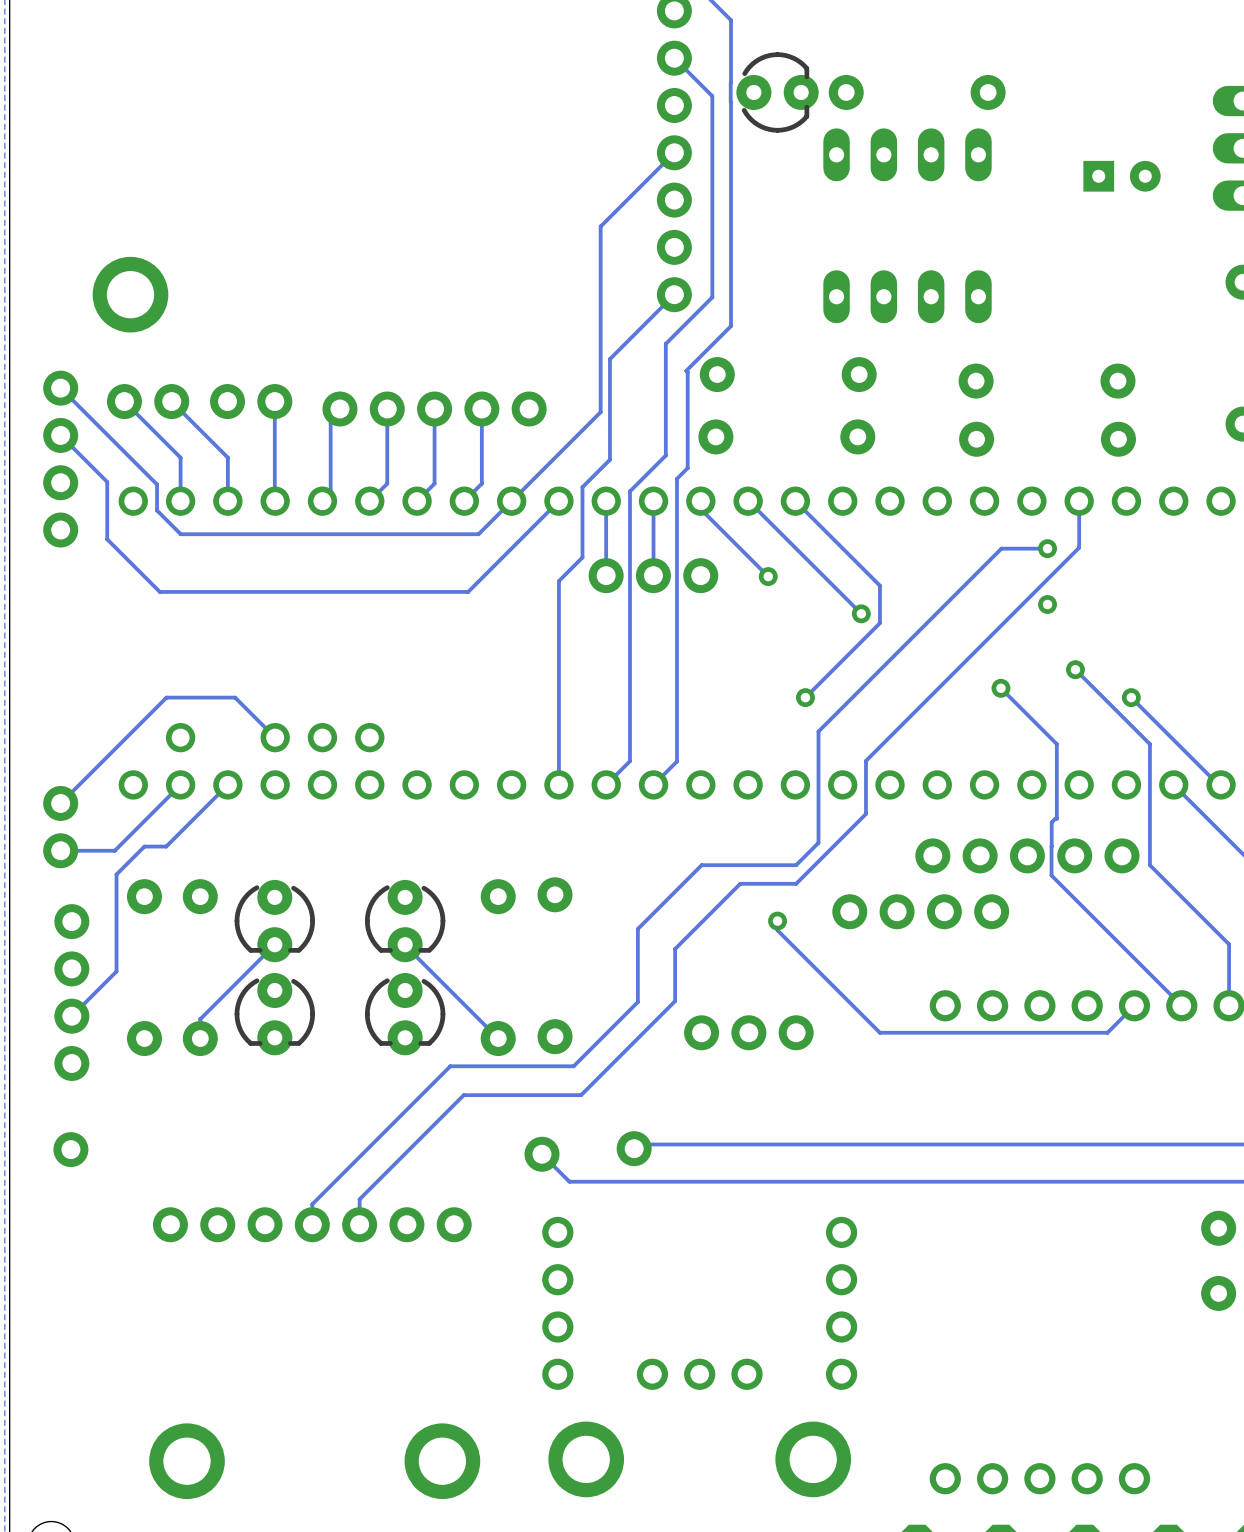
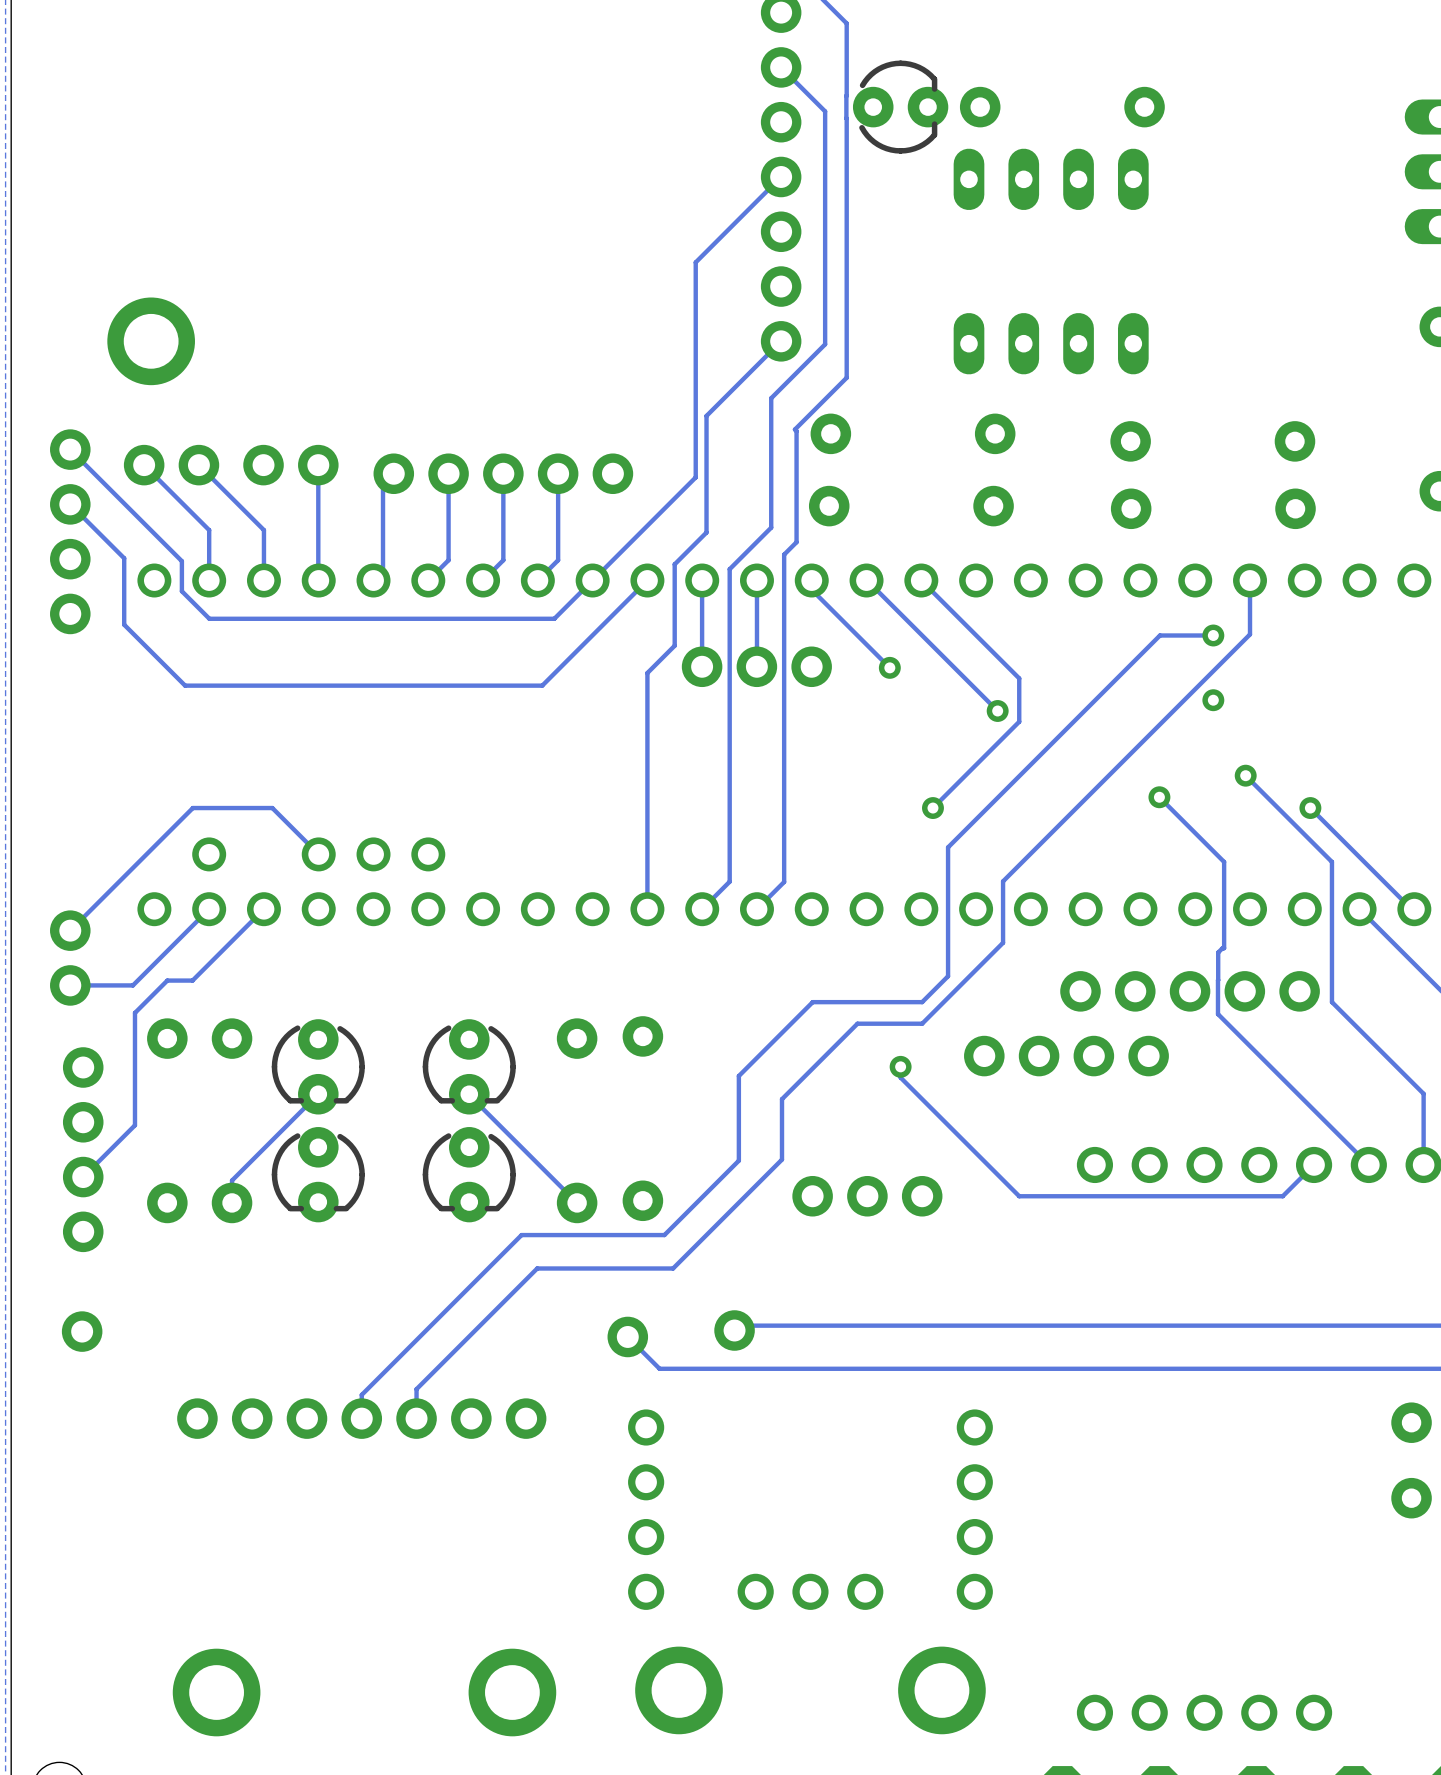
part: (1122, 176) -> none

